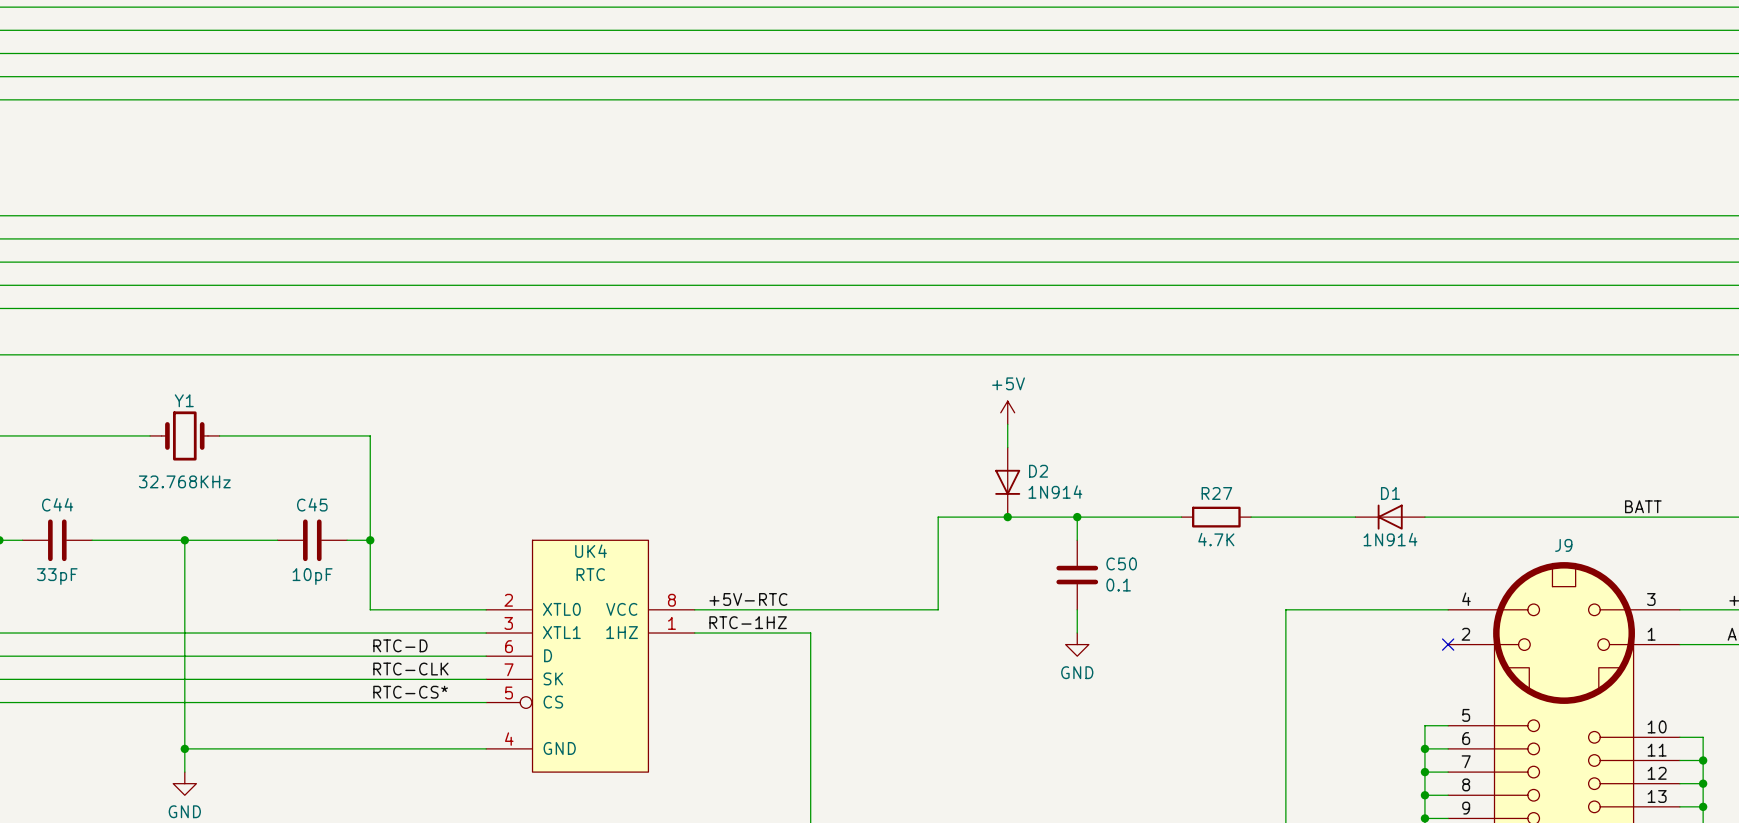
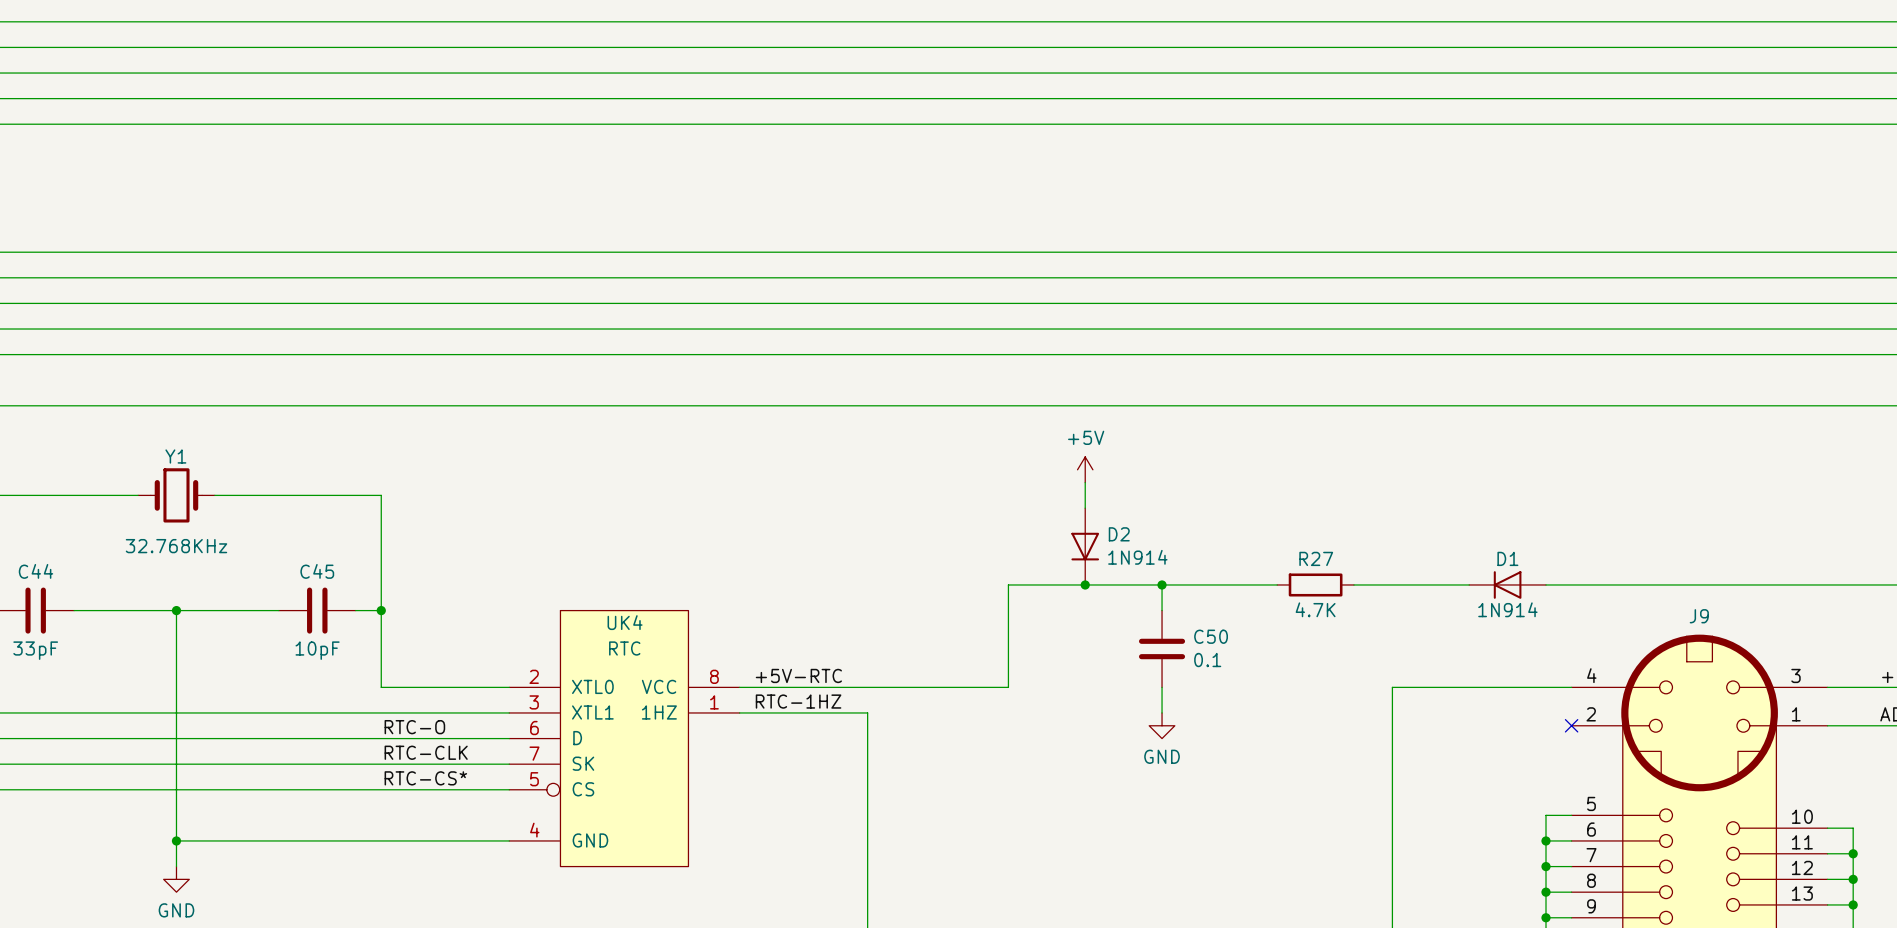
label: BATT (1643, 506) -> none
label: RTC-D (400, 645) -> RTC-O (414, 727)

